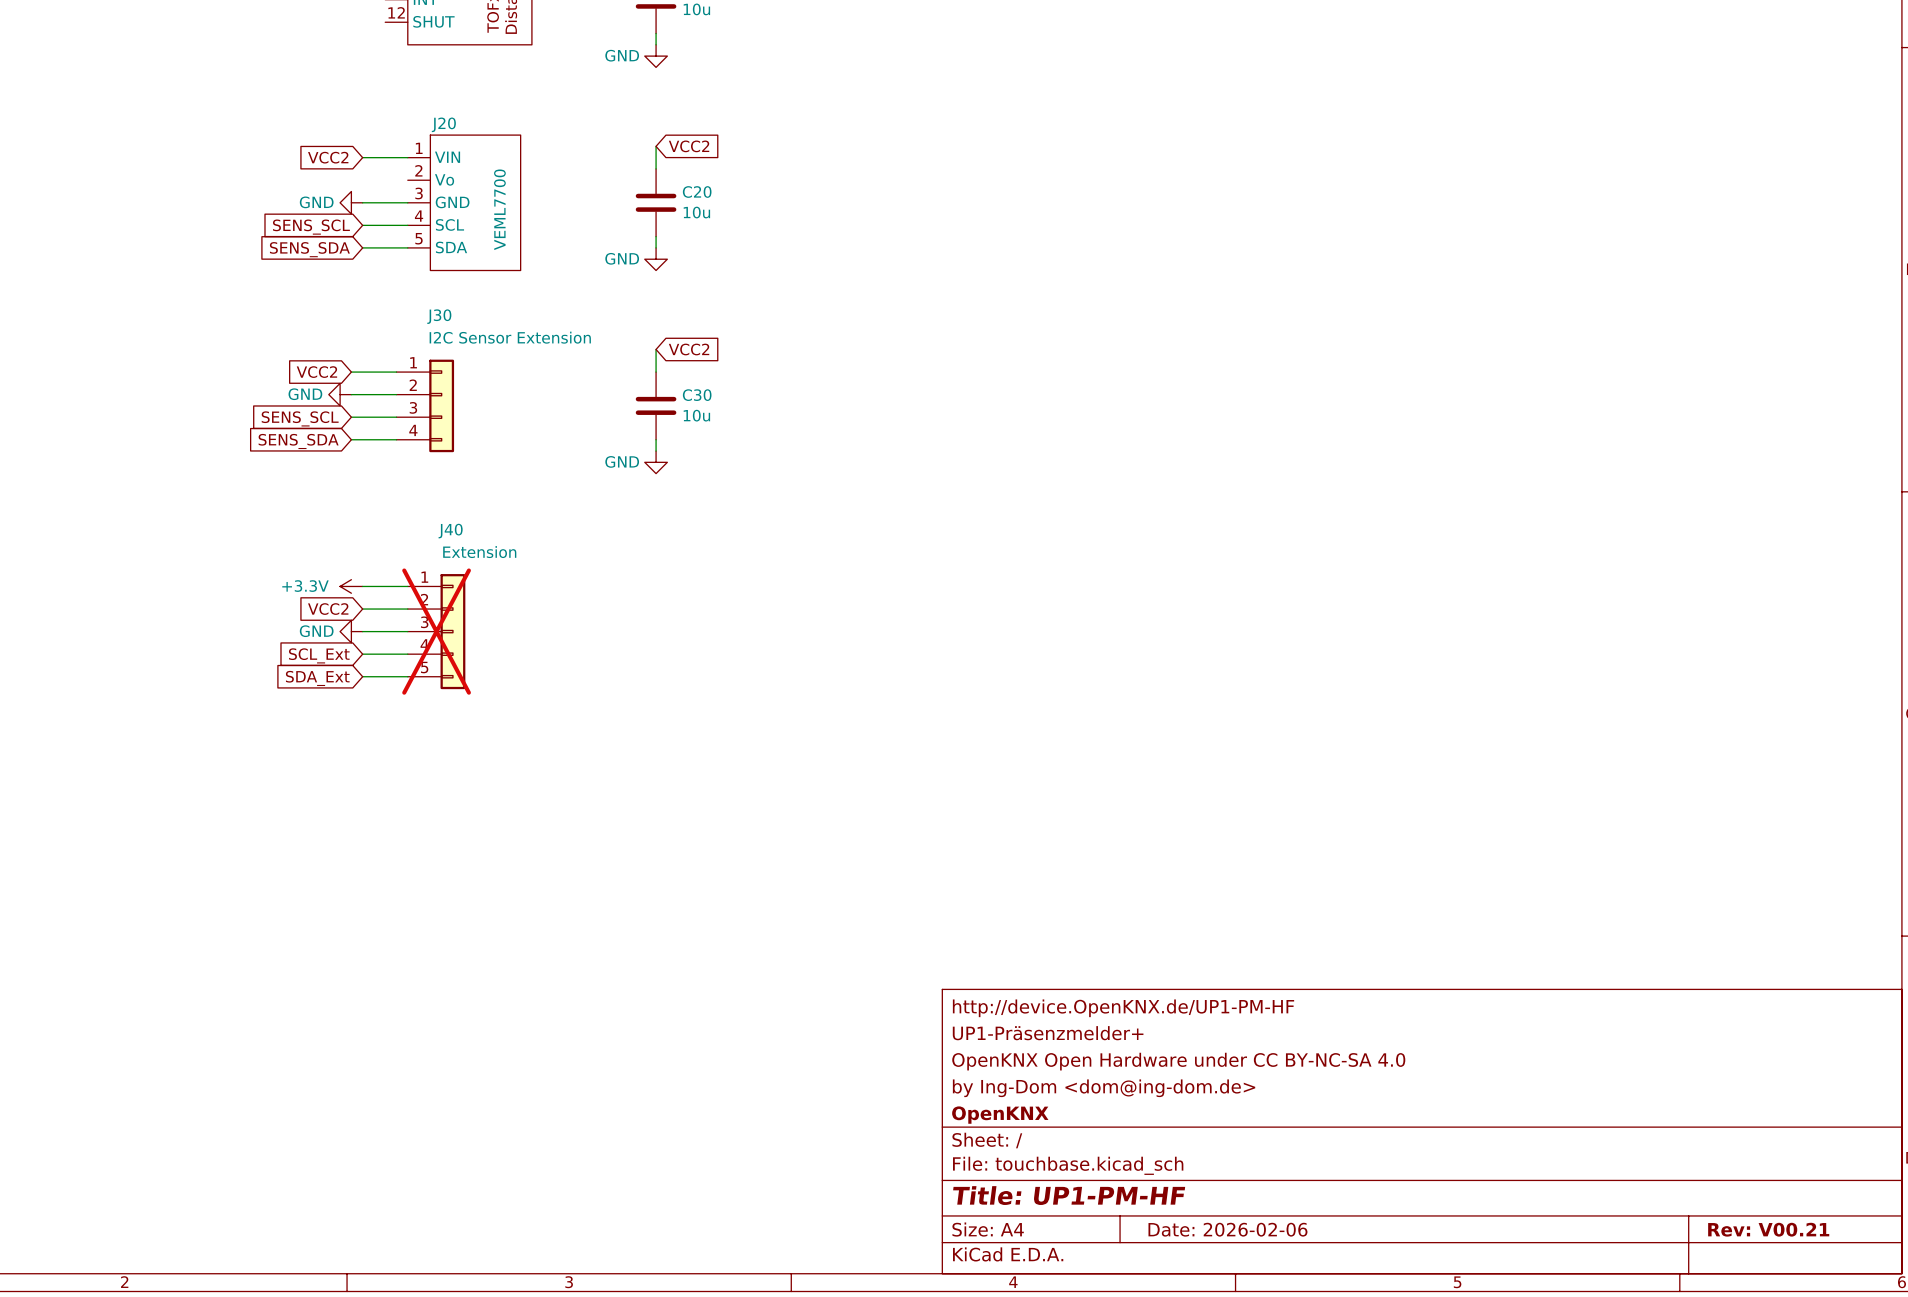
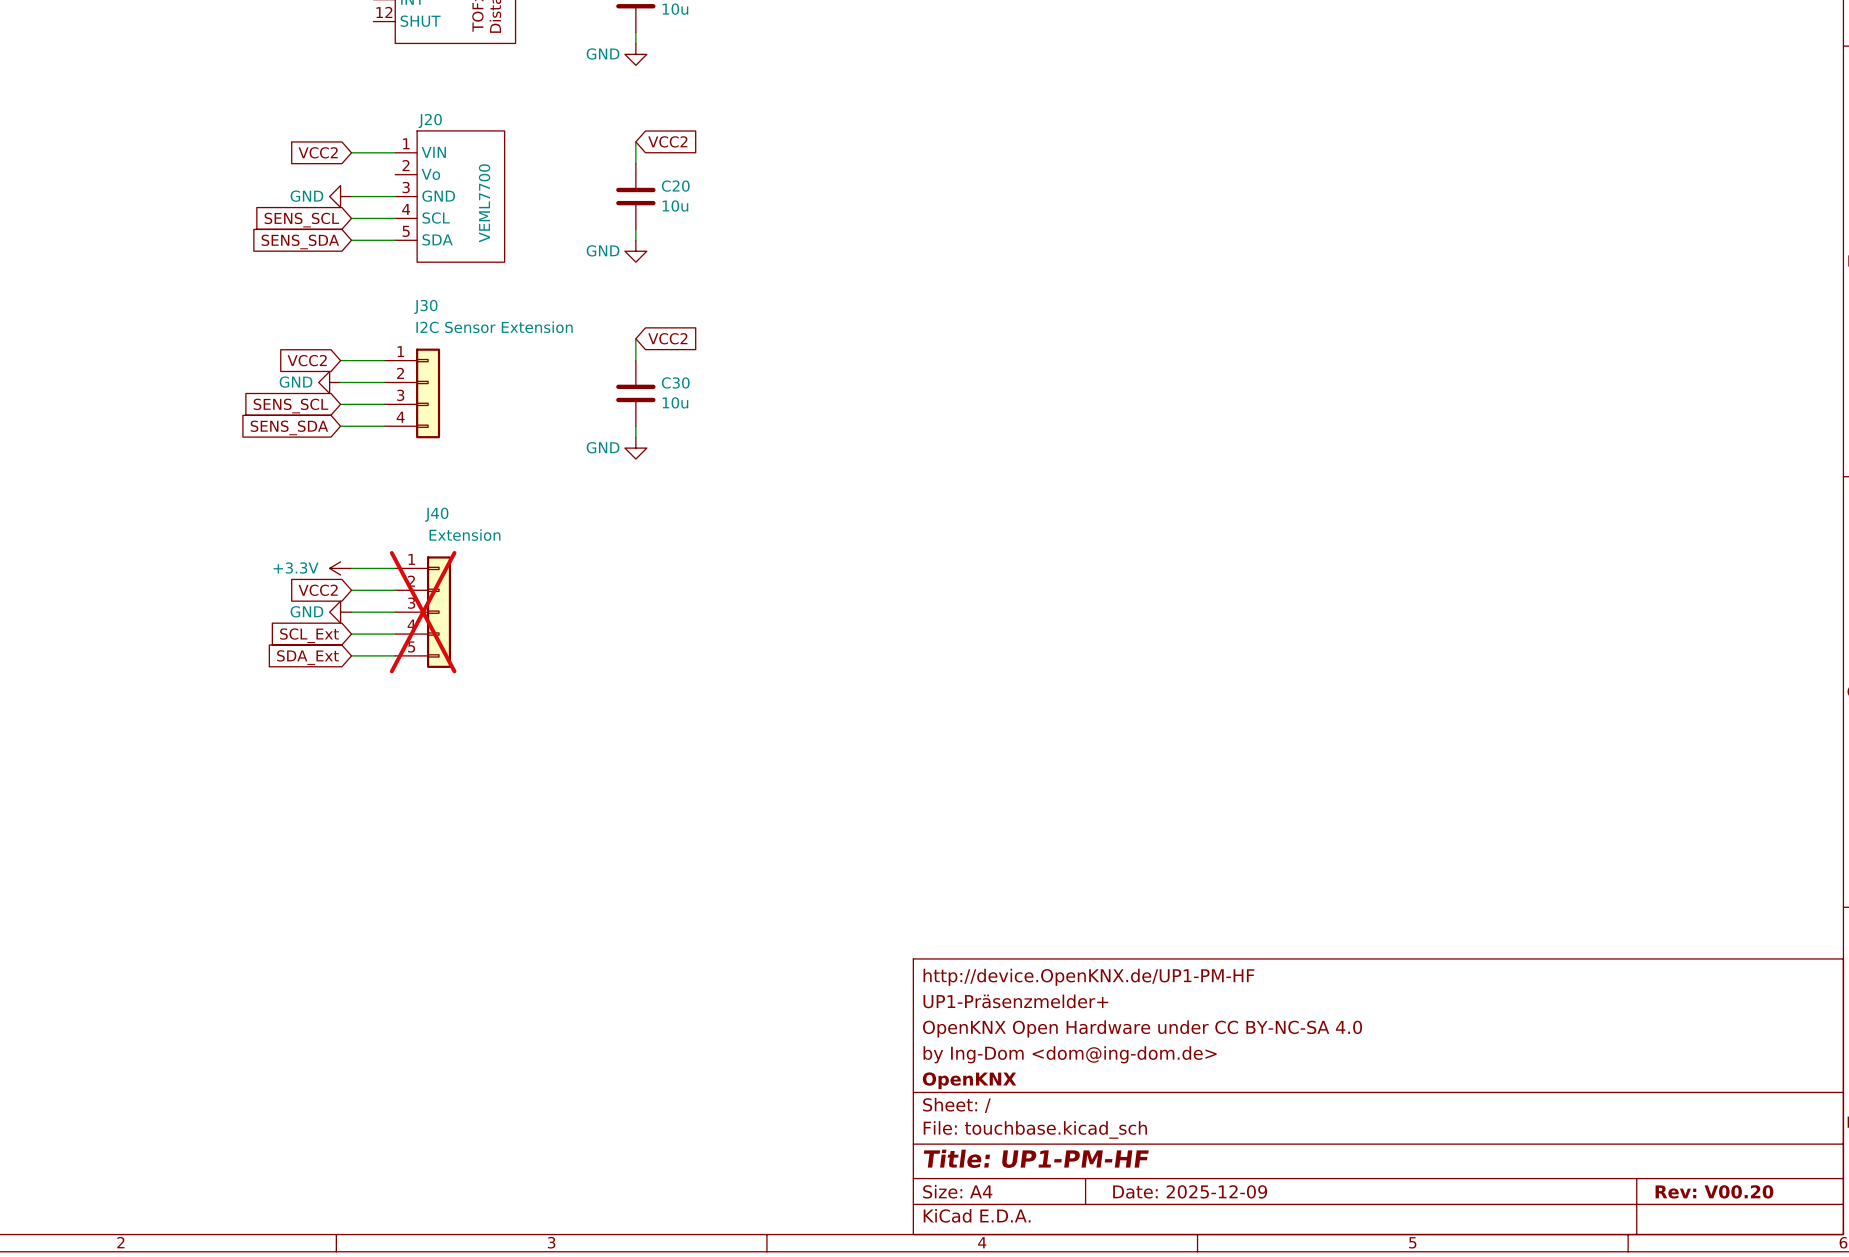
title block: Date: 2026-02-06 (1227, 1229) -> Date: 2025-12-09 (1190, 1191)
title block: Rev: V00.21 (1768, 1229) -> Rev: V00.20 (1714, 1191)

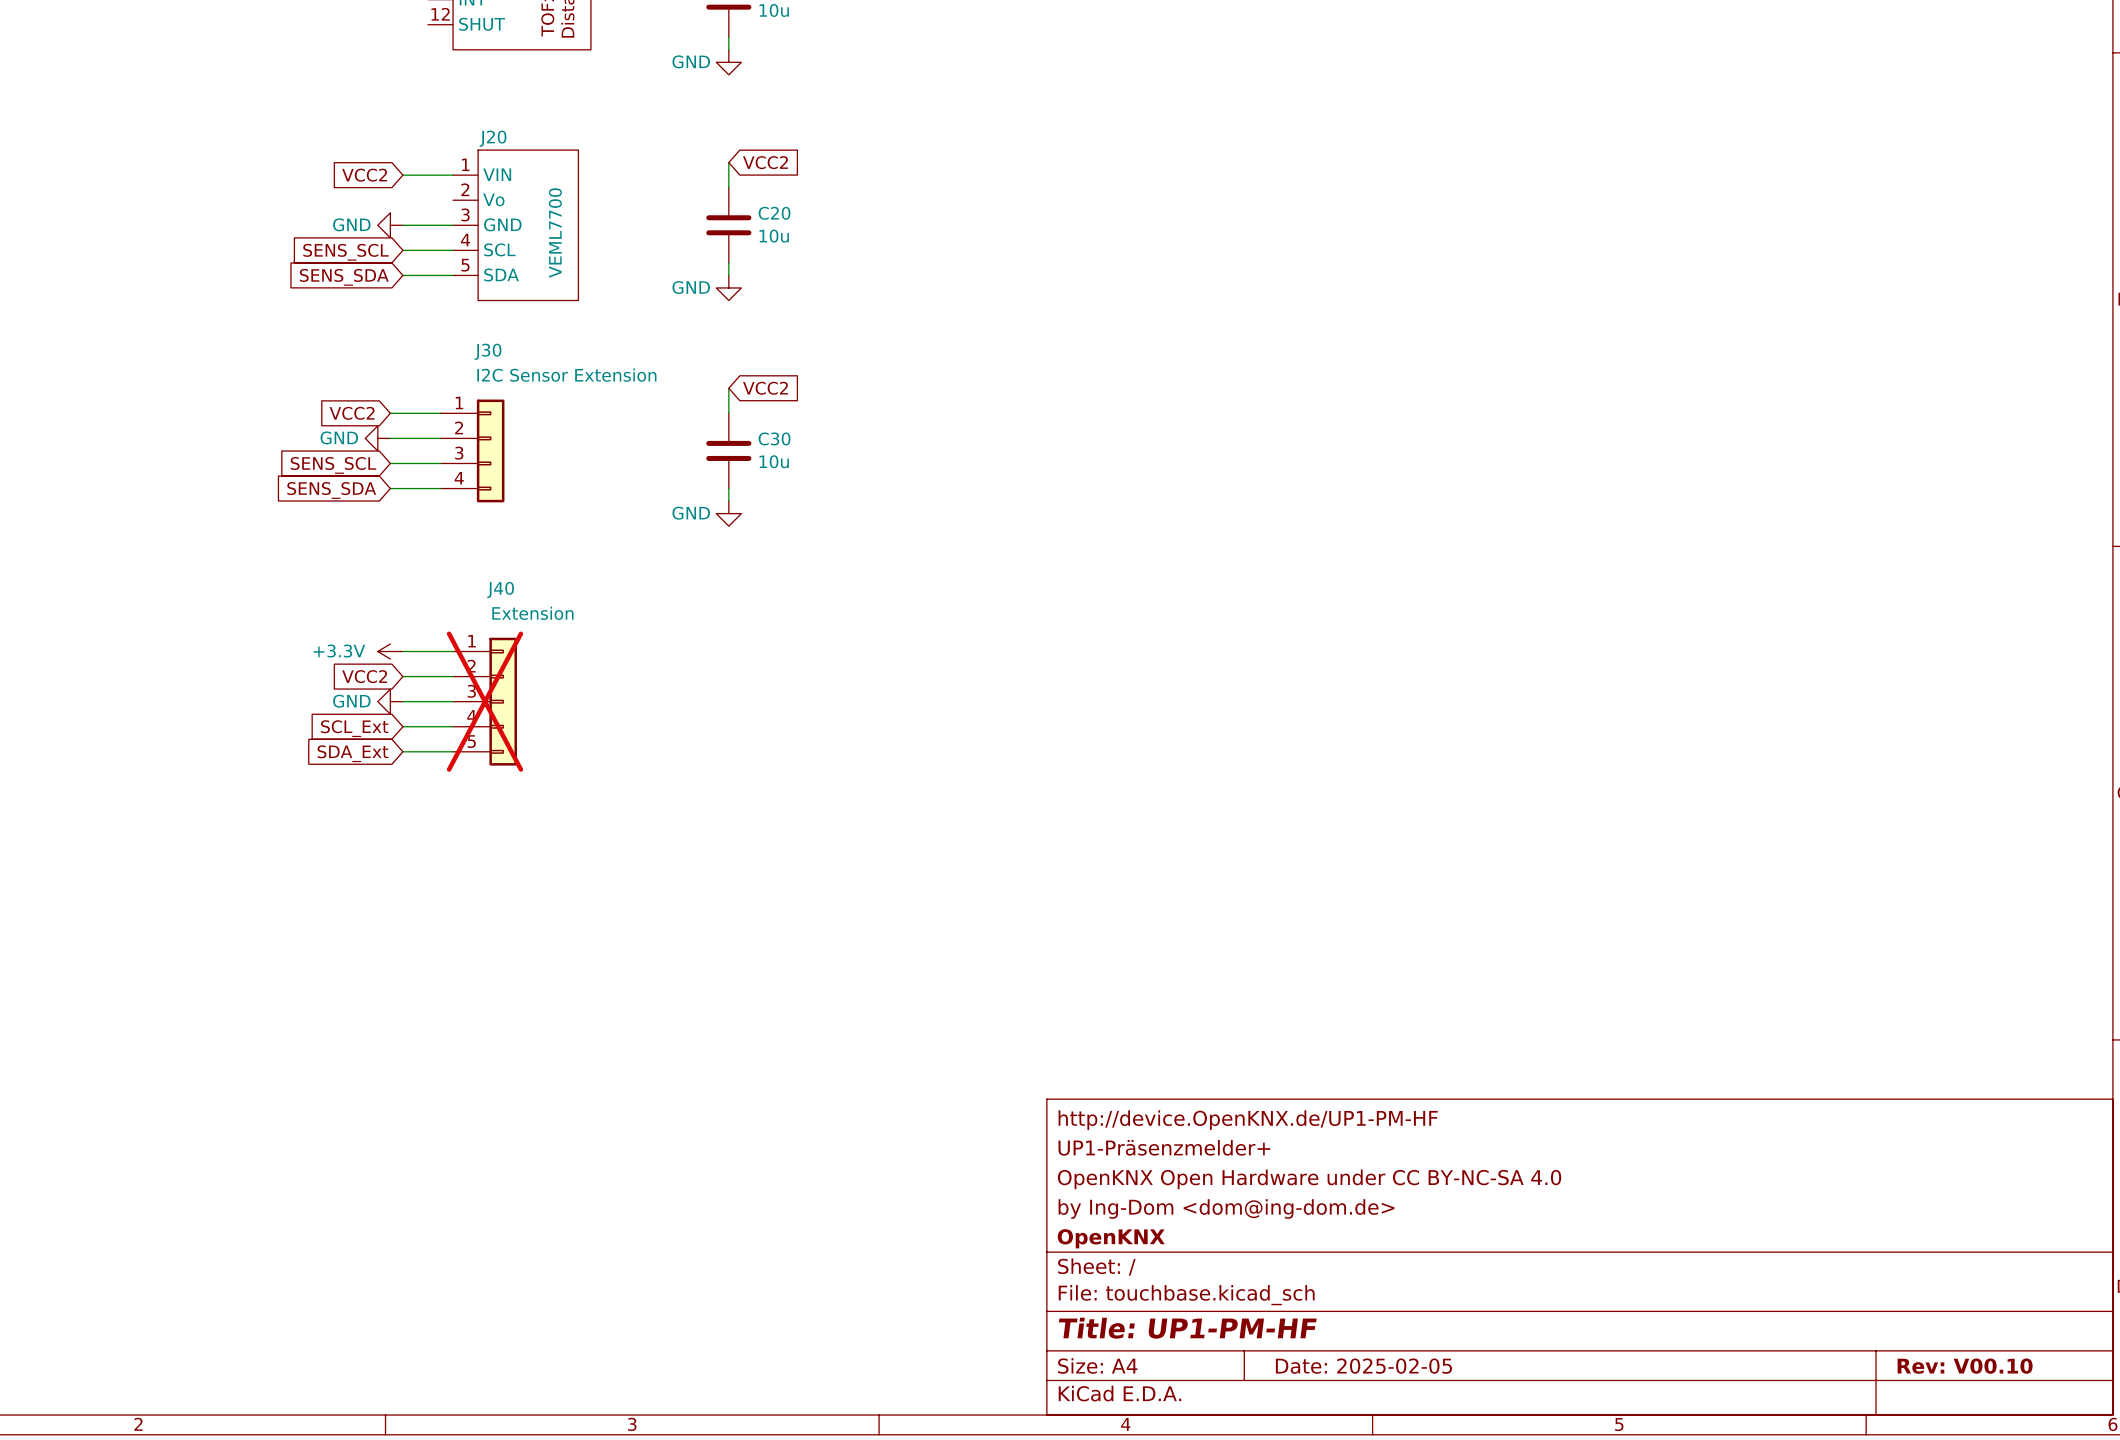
title block: Date: 2025-12-09 (1190, 1191) -> Date: 2025-02-05 (1363, 1366)
title block: Rev: V00.20 (1714, 1191) -> Rev: V00.10 (1965, 1366)

